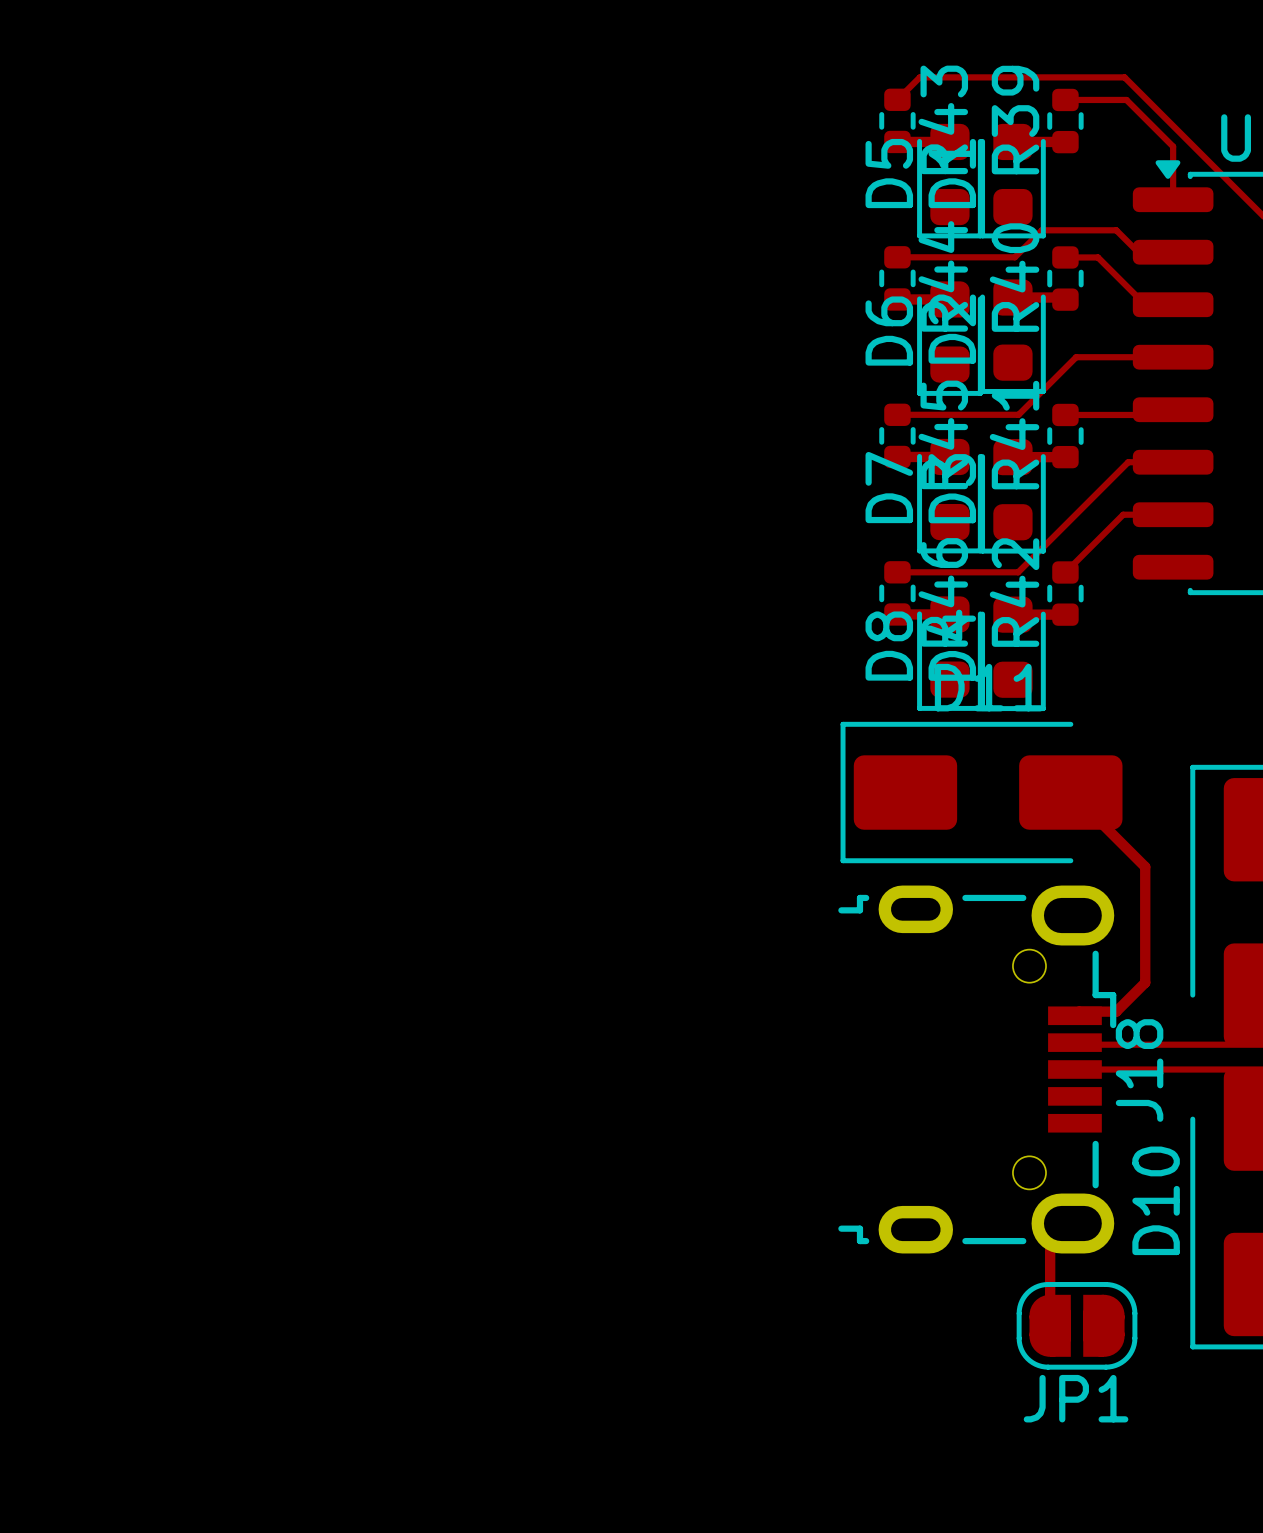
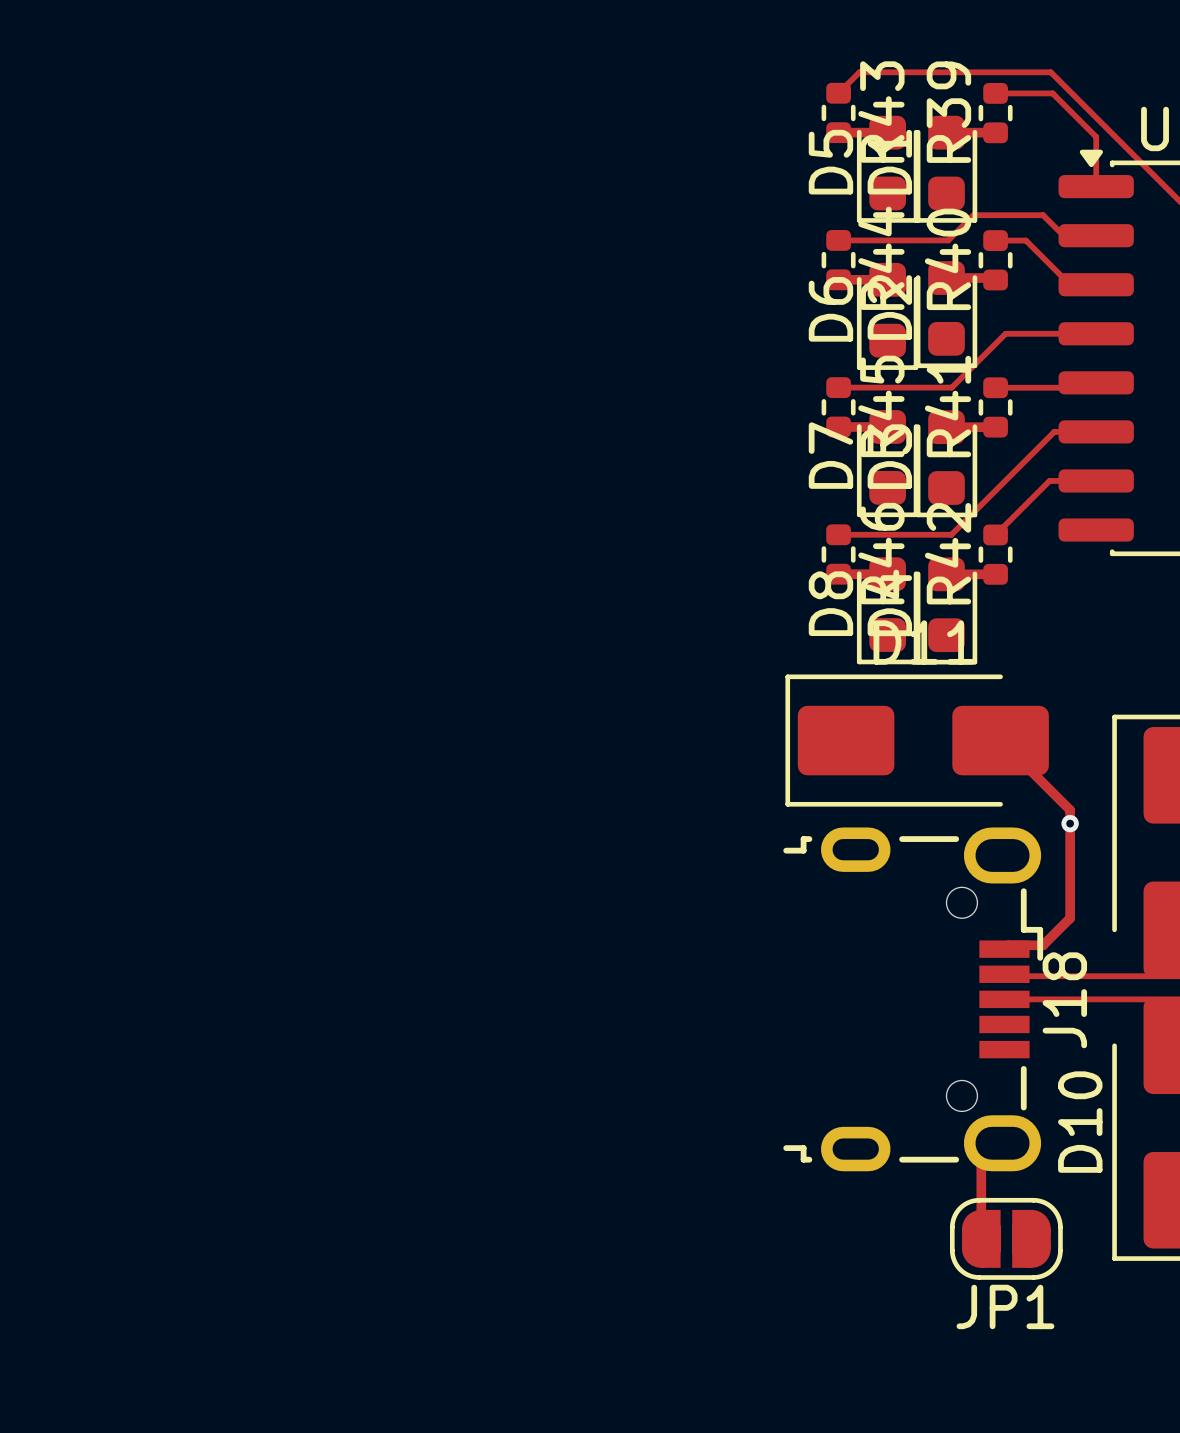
via: none -> (1070, 823)

